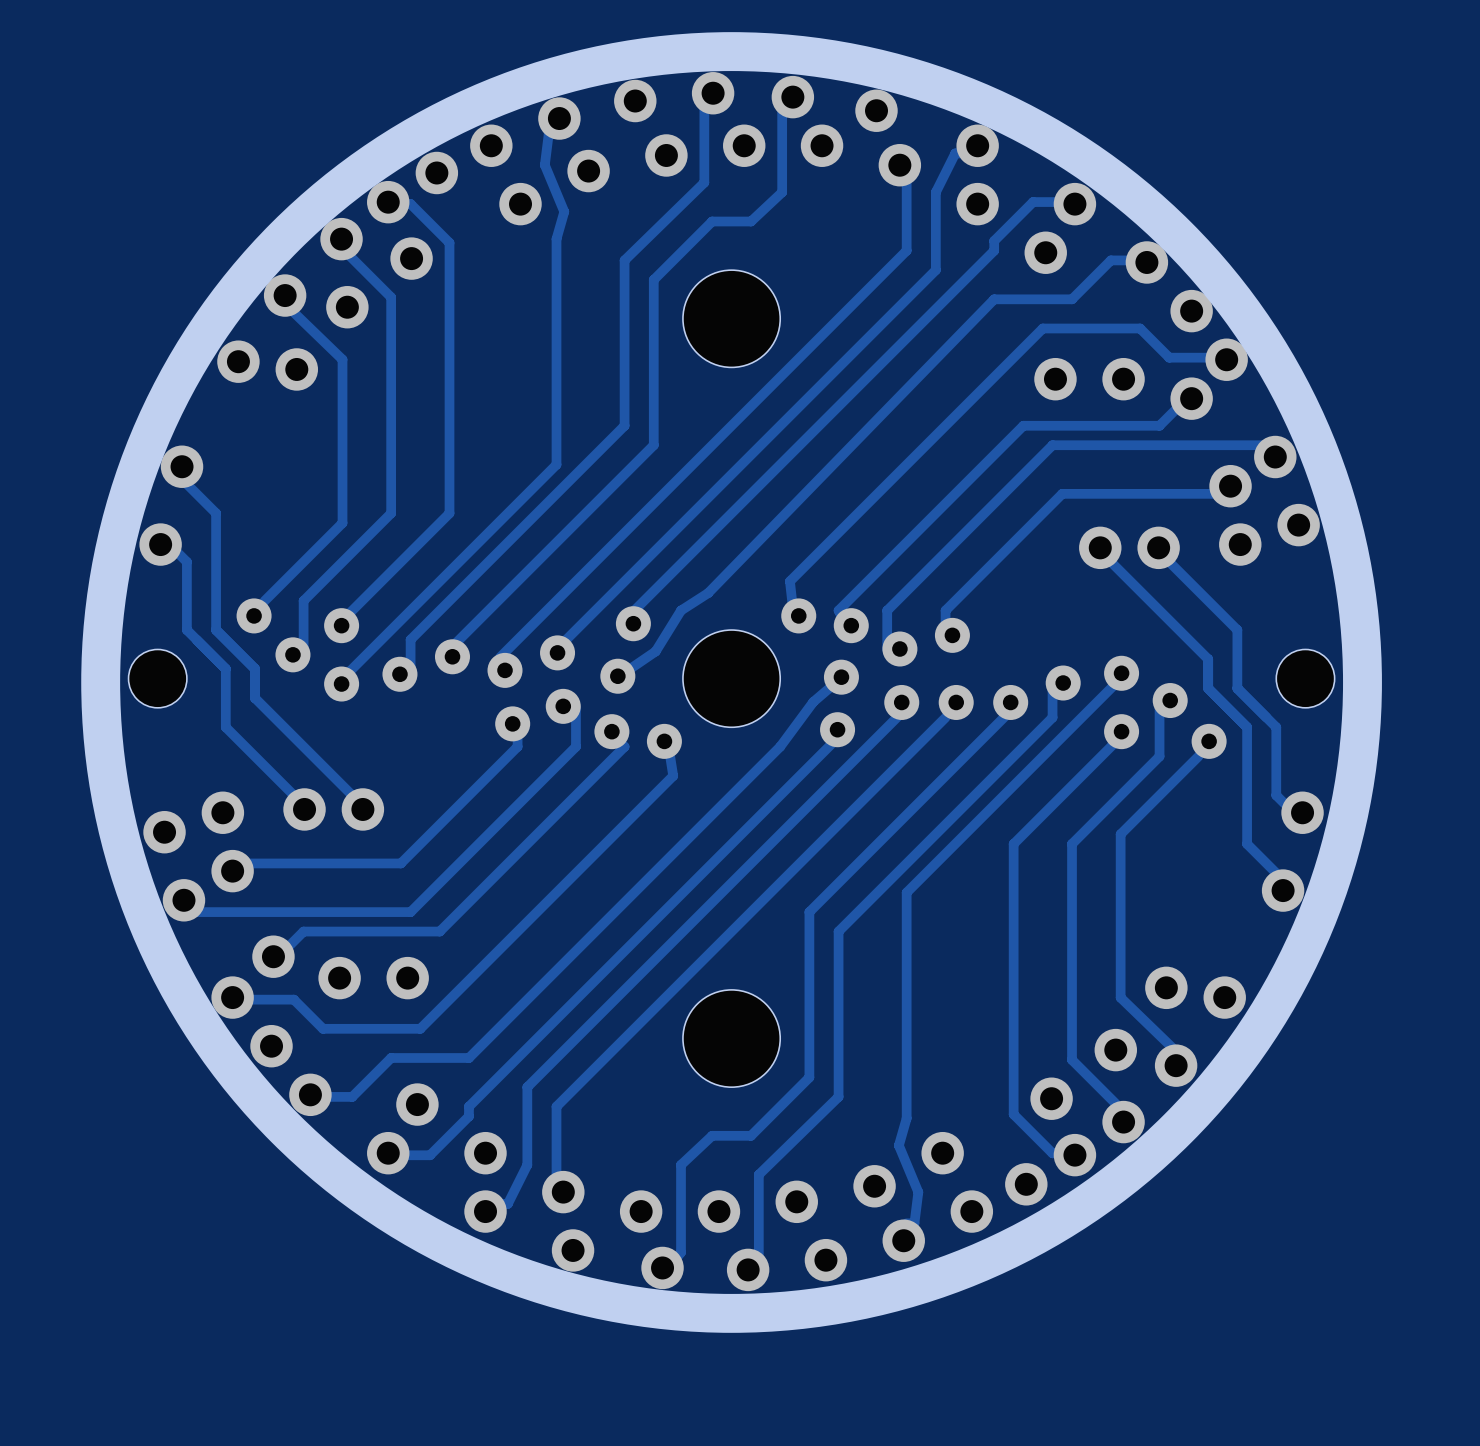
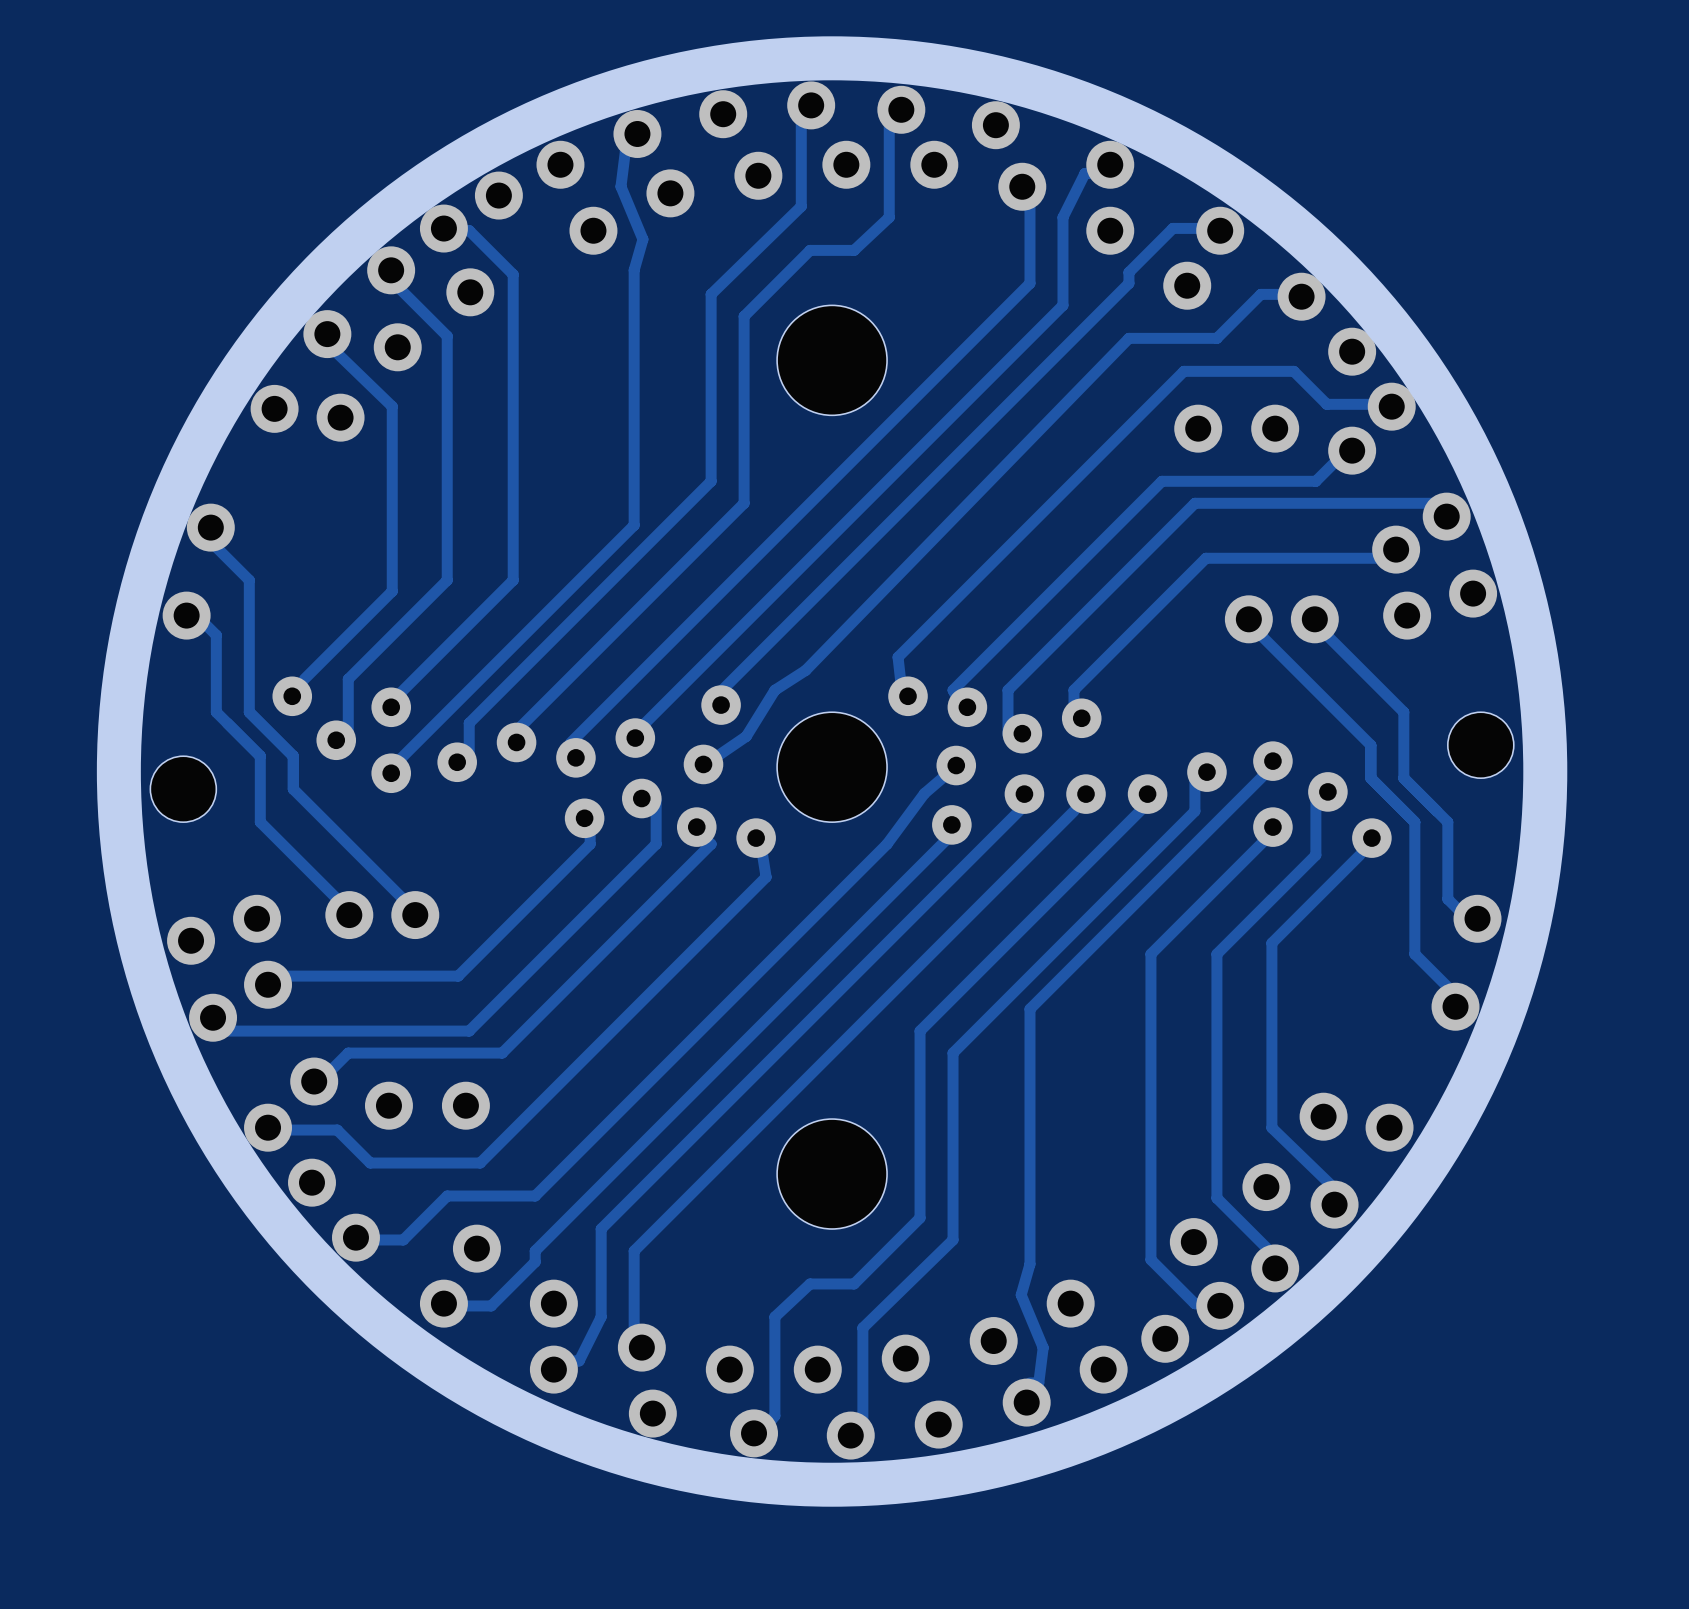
hole position: (157, 678) -> (183, 789)
hole position: (1305, 678) -> (1480, 745)

